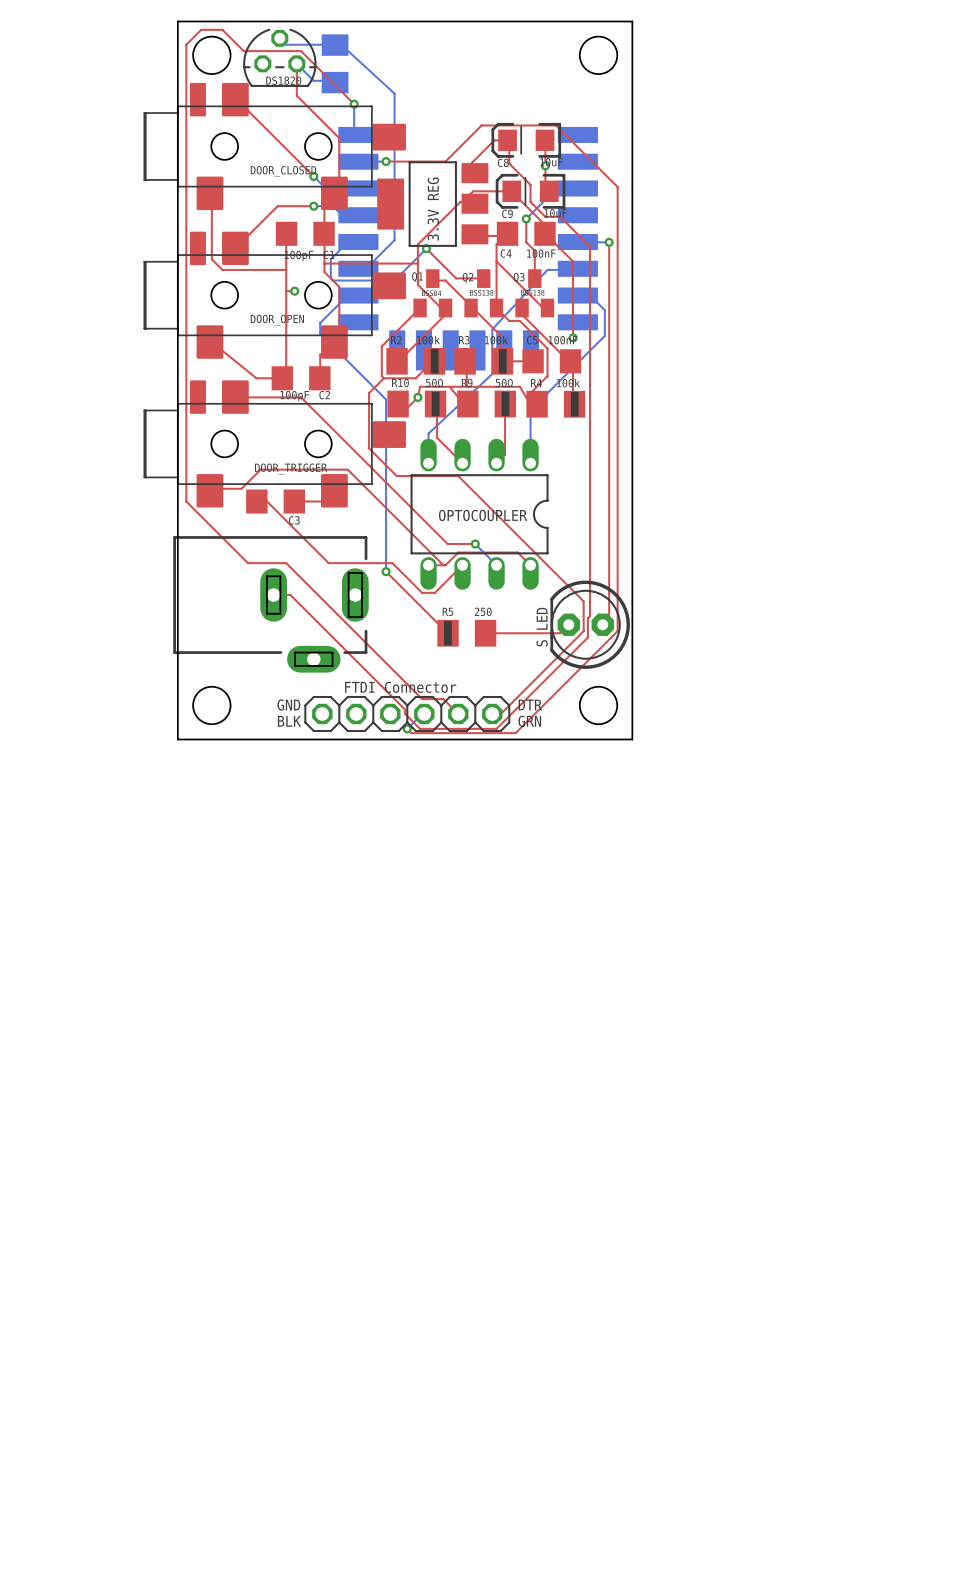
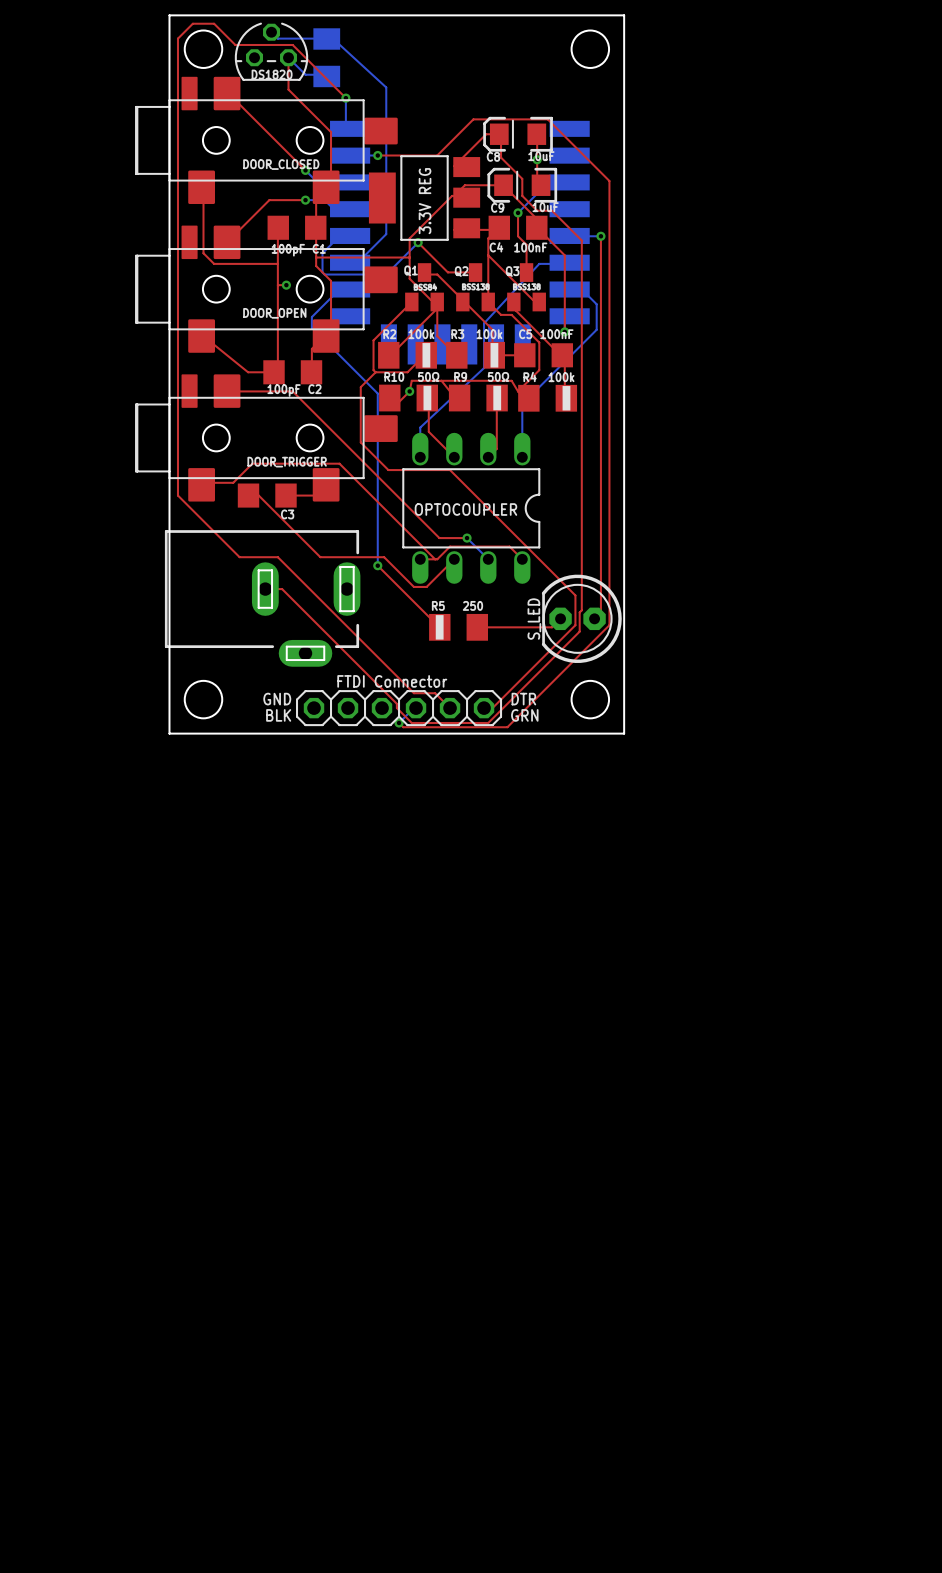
top track: (465, 361) (466, 361) (466, 386) -> (456, 355) (437, 336) (437, 308)

